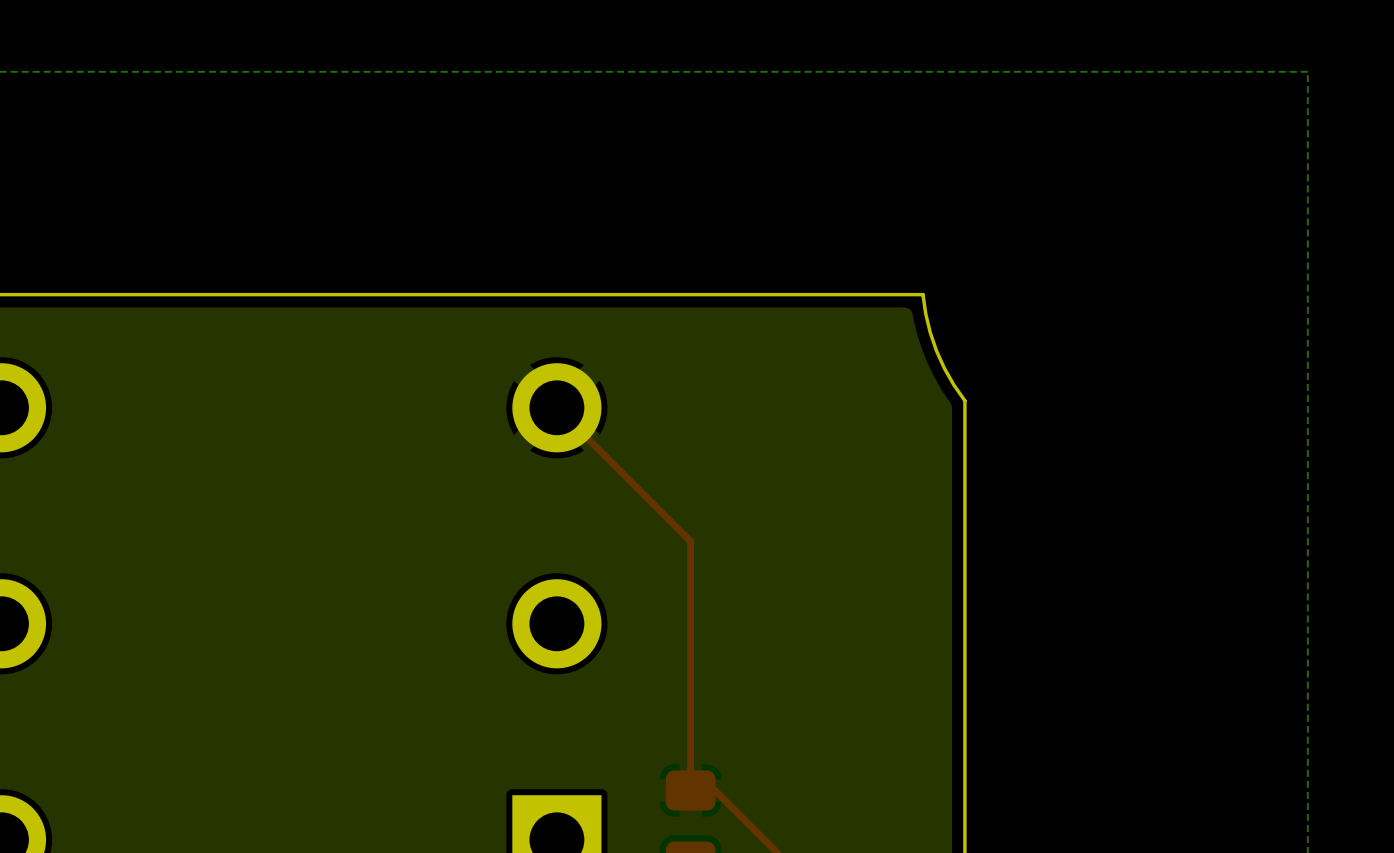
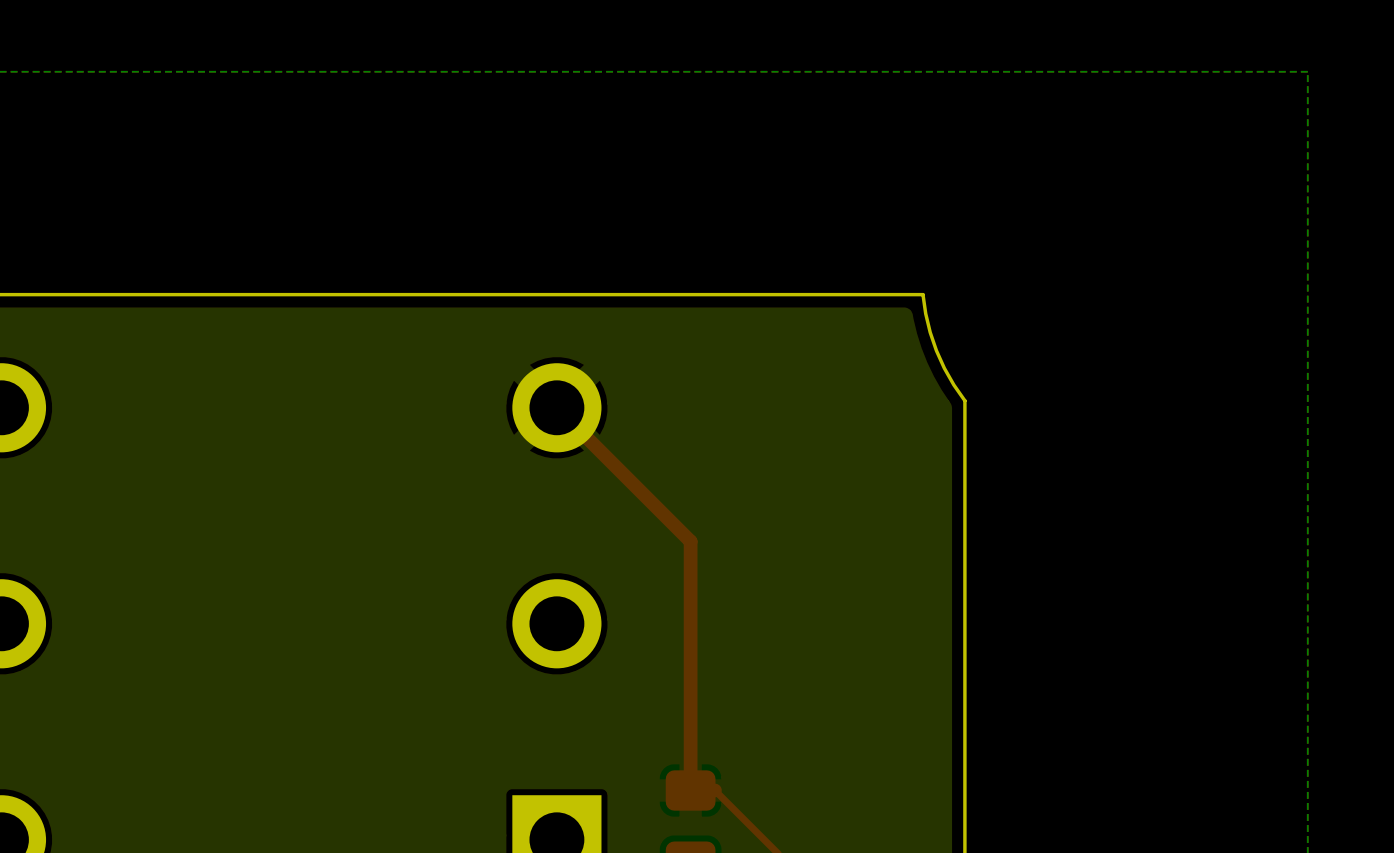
top track width: thin (556, 407) (690, 541) (690, 790) (714, 790) -> thick (556, 407) (690, 541) (690, 790) (714, 790)

